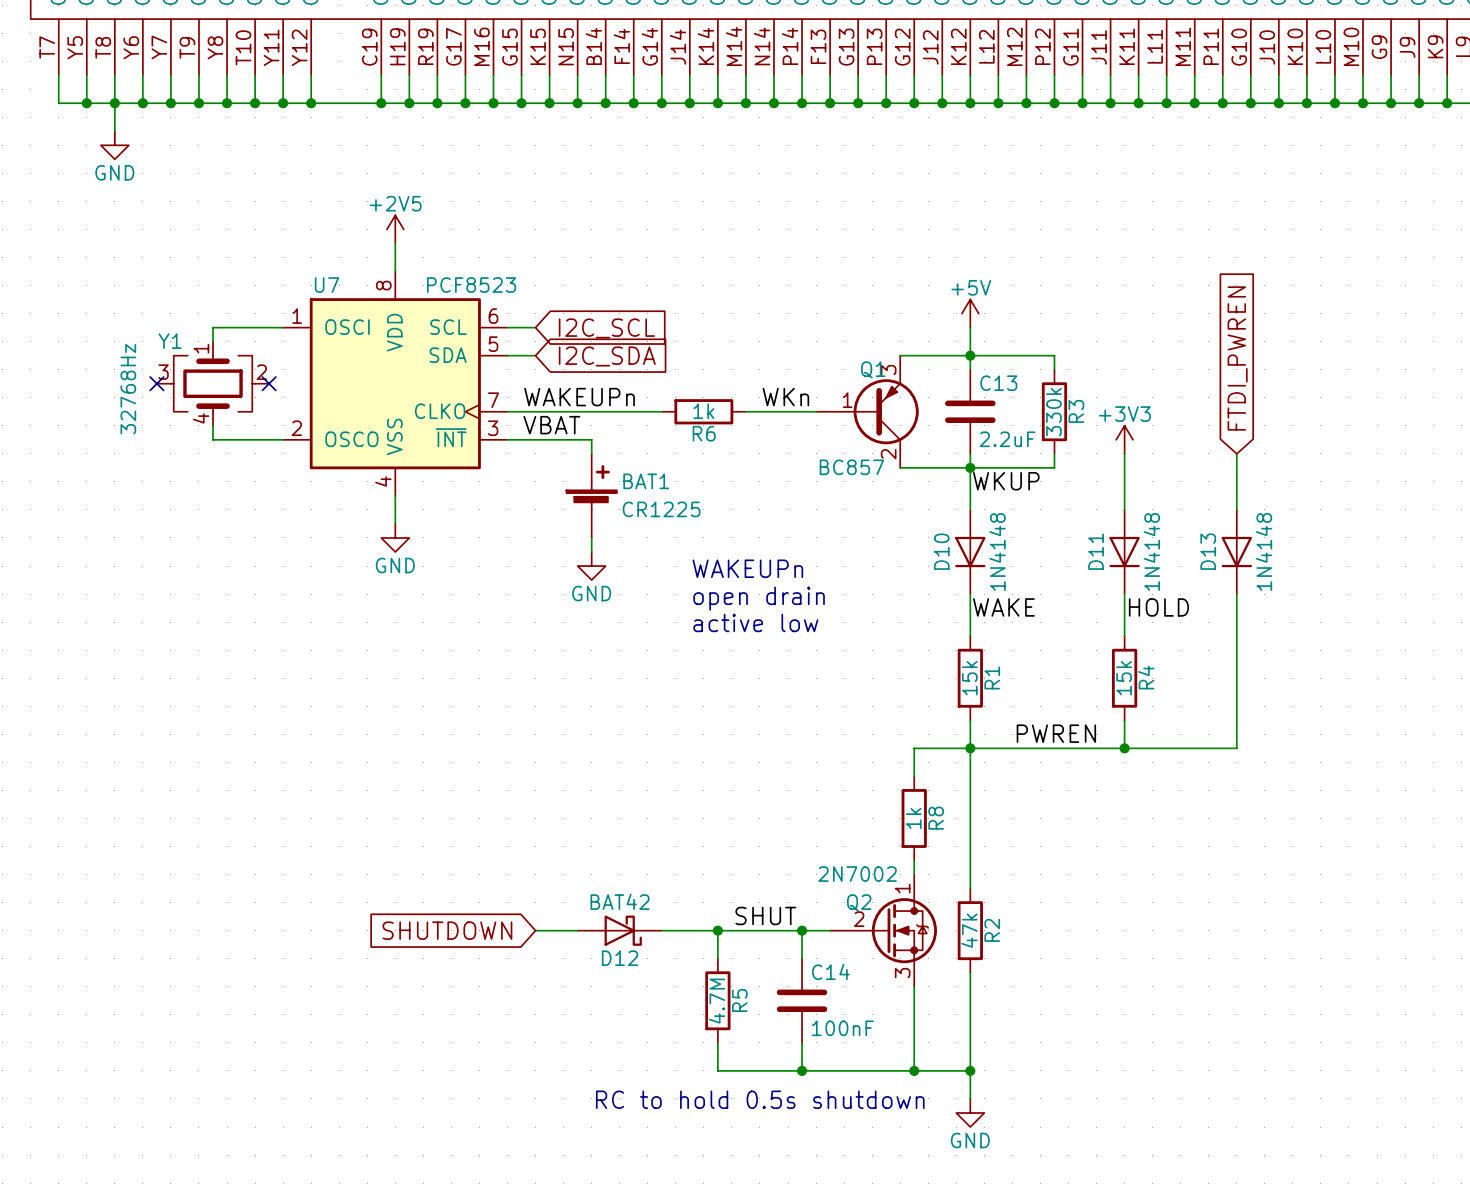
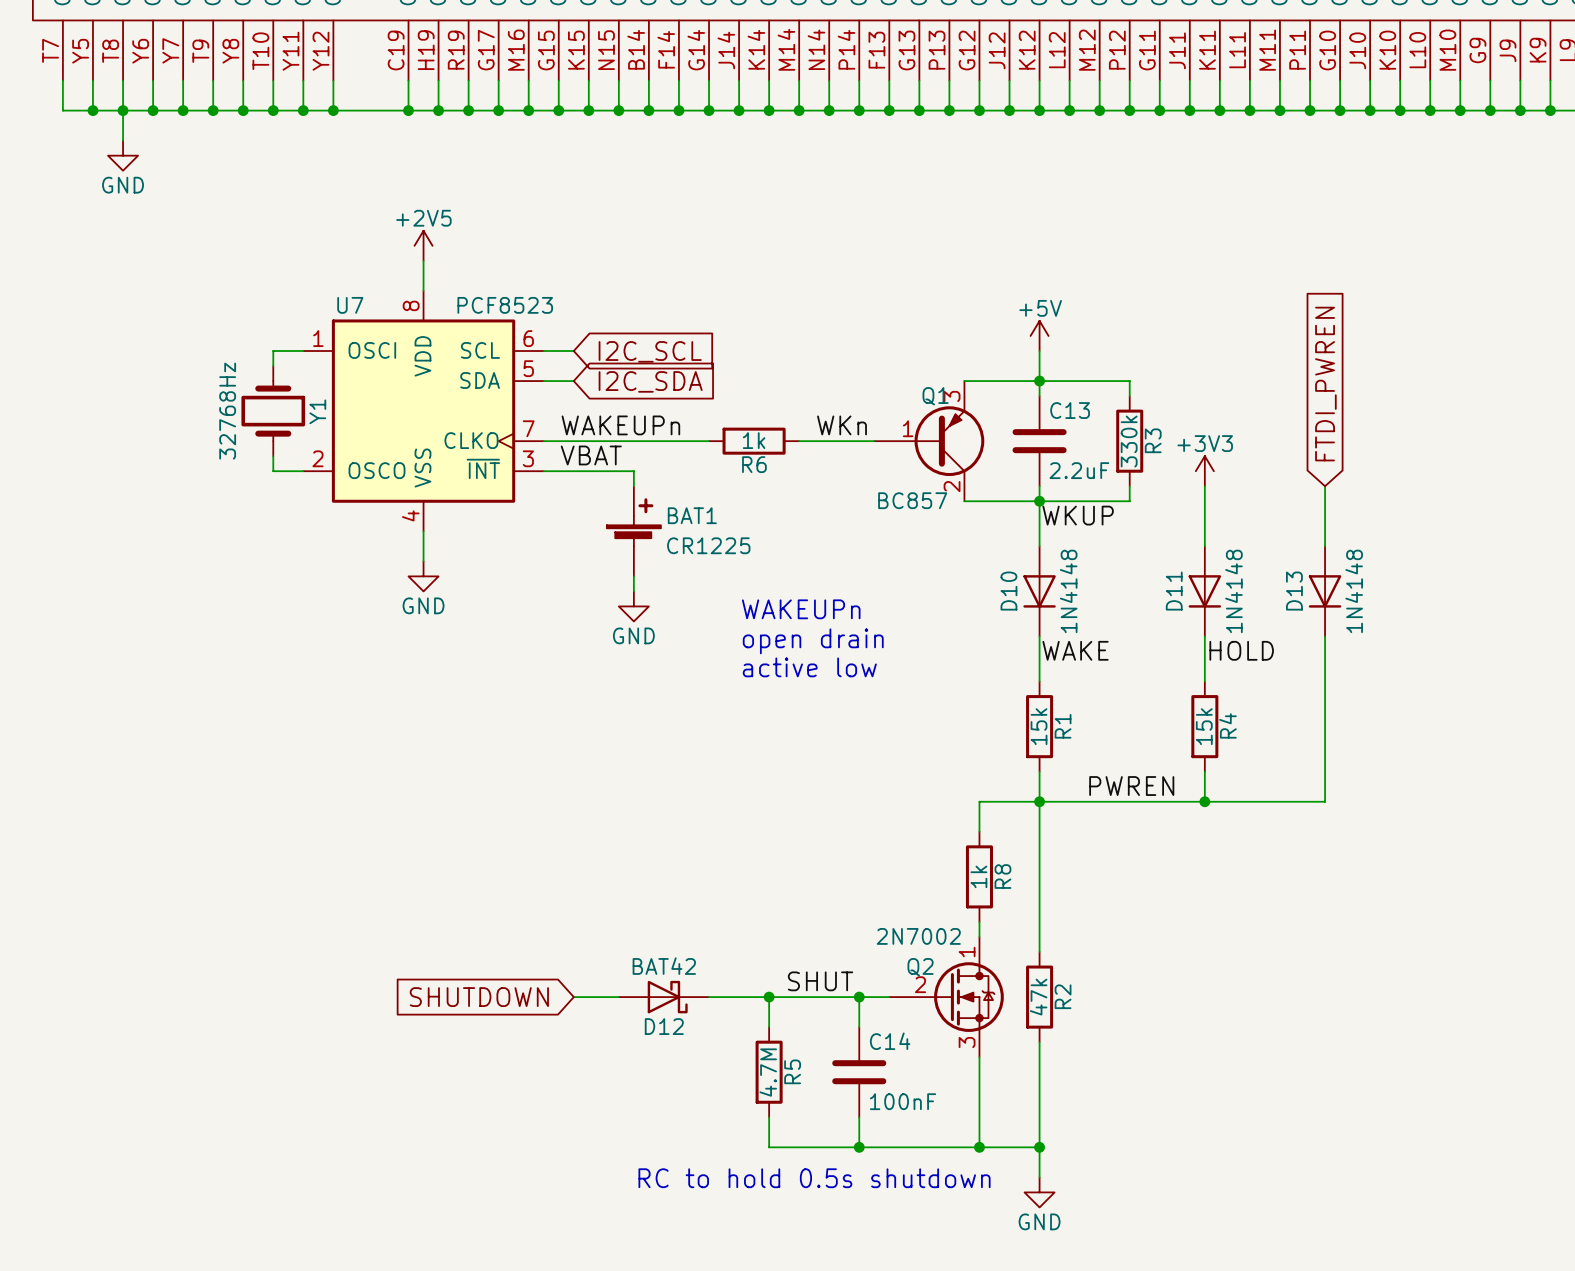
wire: (255, 327) (213, 327) (213, 341) -> (273, 351) (273, 366)
Y1 symbol: [156, 341, 270, 426] -> [241, 366, 306, 457]
Y1 name position: Y1 (170, 341) -> Y1 (317, 411)
no-connect mark: (156, 383) -> none
no-connect mark: (269, 383) -> none
Y1 value position: 32768Hz (128, 389) -> 32768Hz (227, 411)
wire: (213, 425) (213, 439) (255, 439) -> (273, 456) (273, 471)

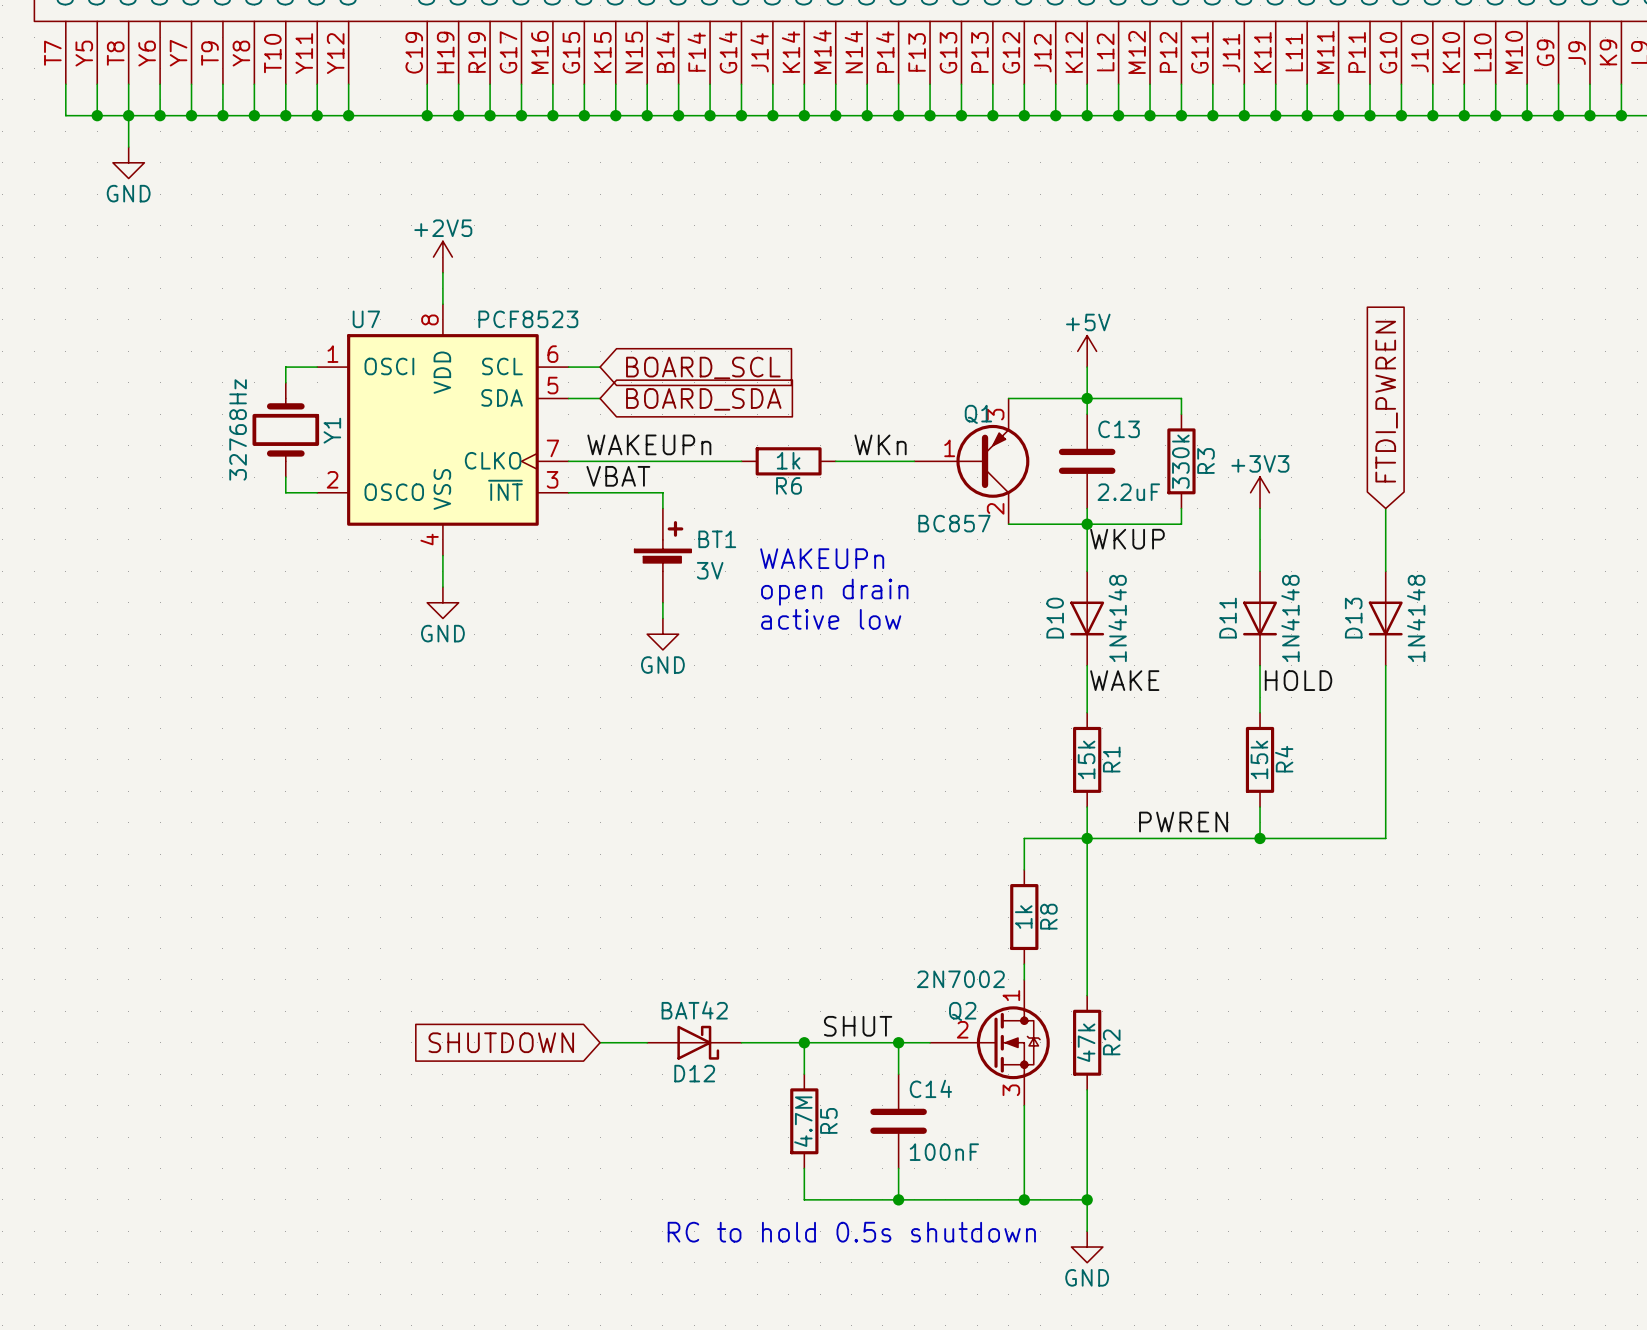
global label: I2C_SCL (650, 351) -> BOARD_SCL (703, 367)
global label: I2C_SDA (650, 381) -> BOARD_SDA (703, 399)
BAT1 name: BAT1 (692, 515) -> BT1 (717, 539)
BAT1 value: CR1225 (708, 545) -> 3V (710, 570)
text position: WAKEUPn (801, 609) -> WAKEUPn (822, 558)
text position: open drain (813, 641) -> open drain (834, 592)
text position: active low (809, 667) -> active low (831, 619)

